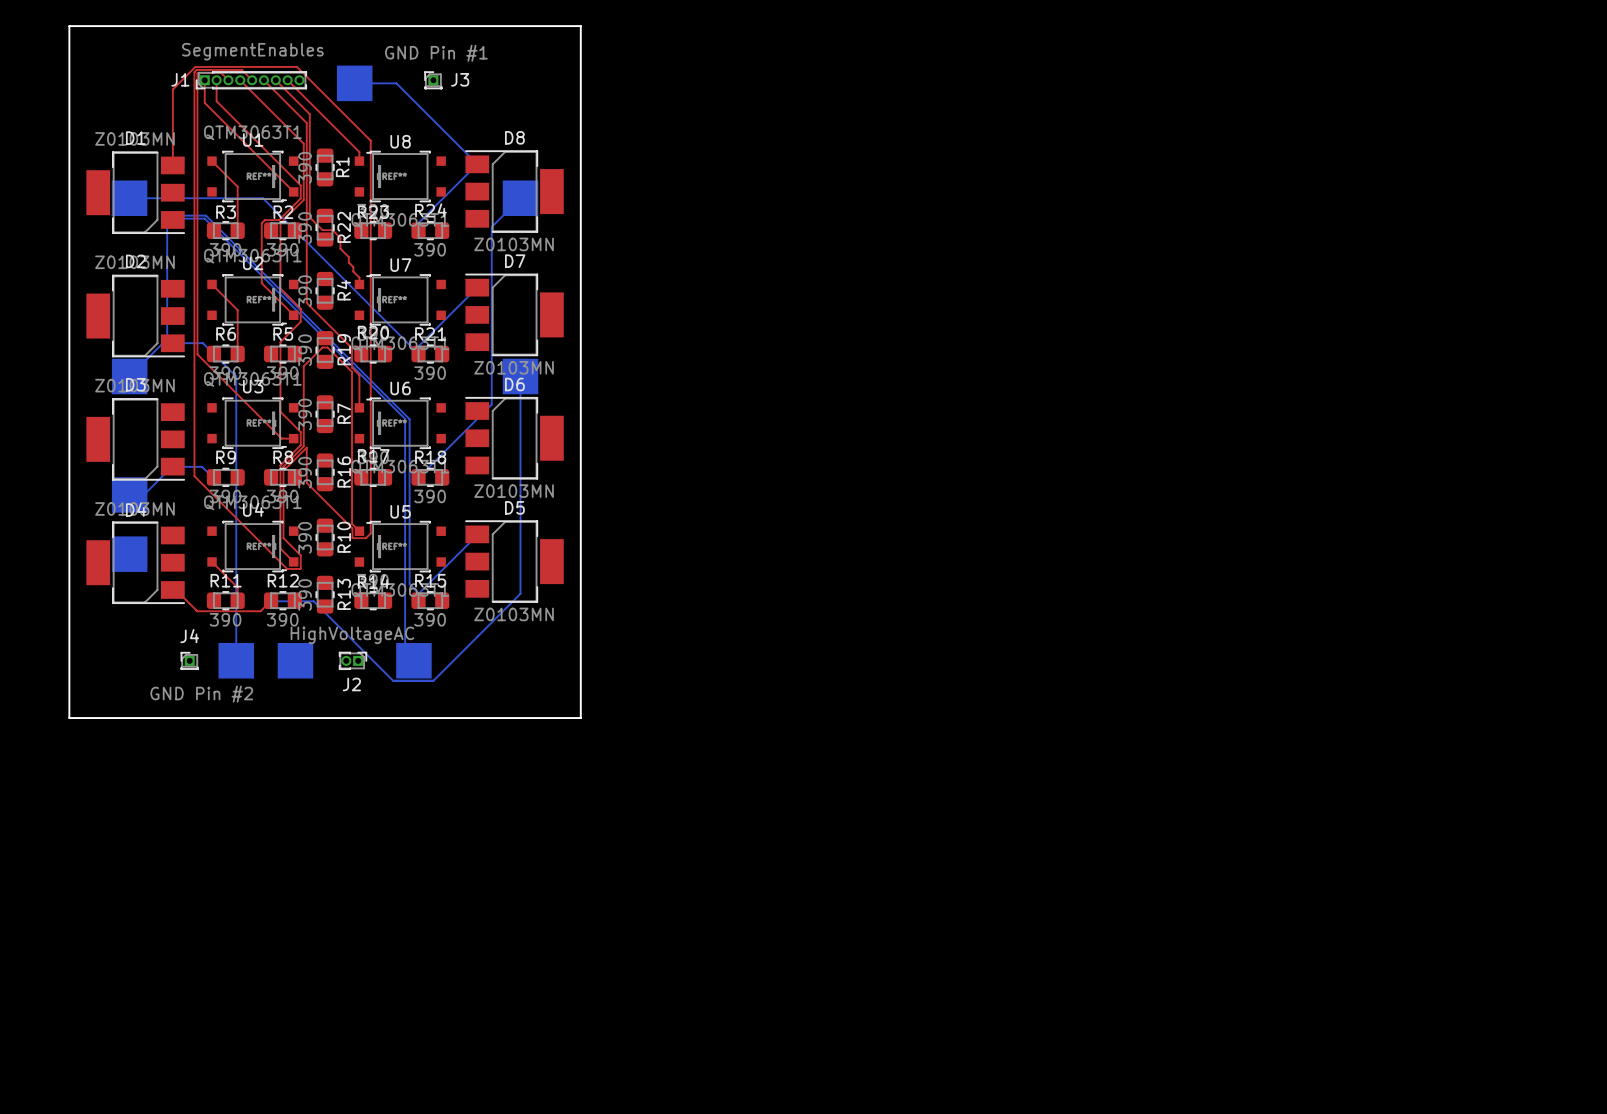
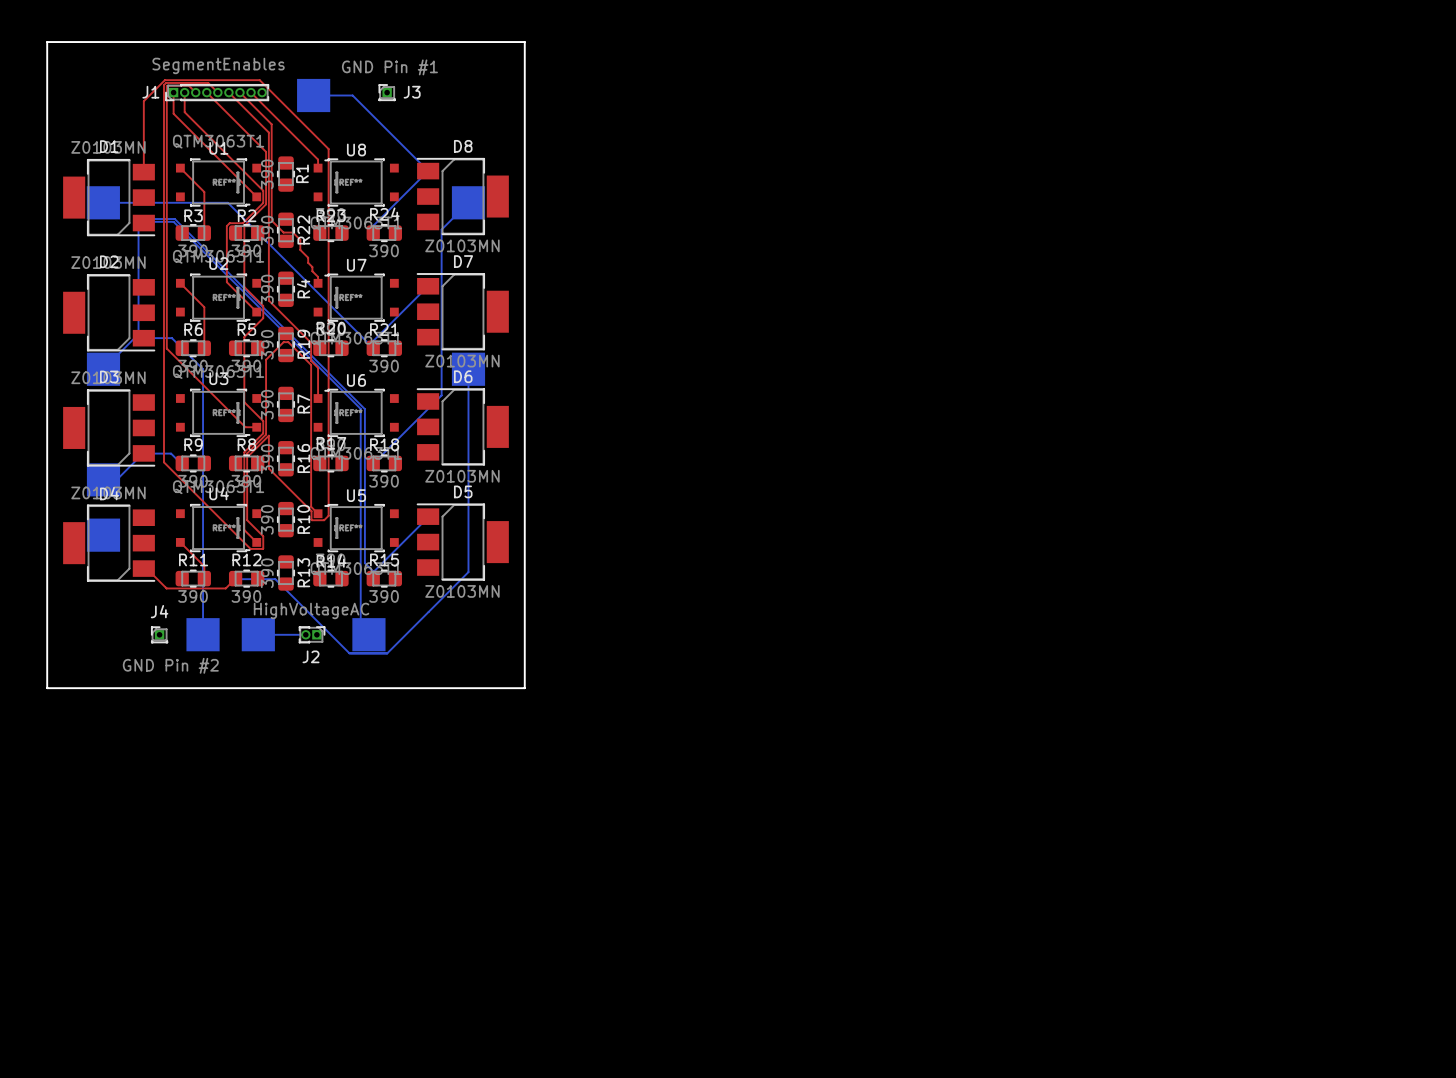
bottom track: none -> (258, 634) (305, 634)

